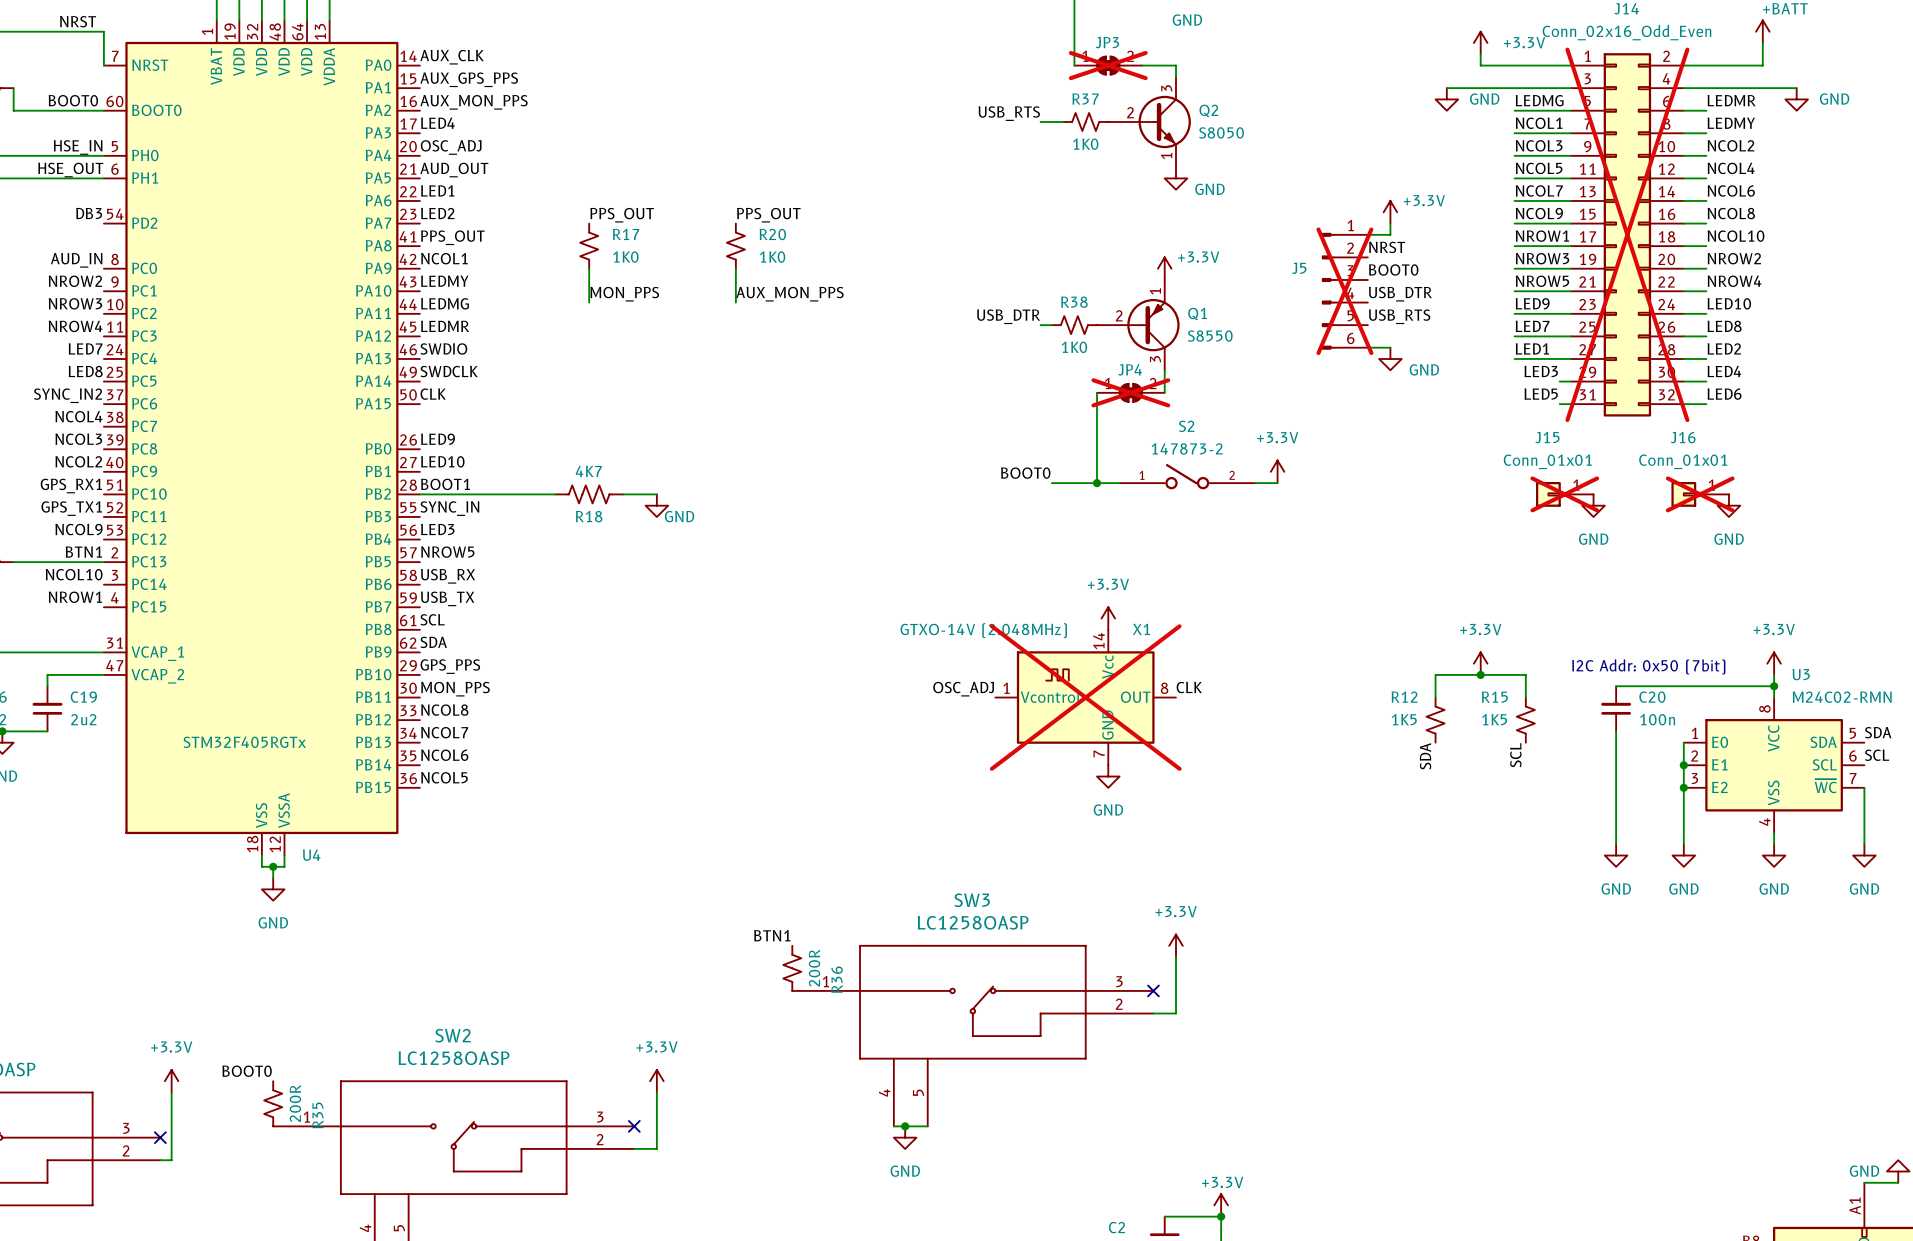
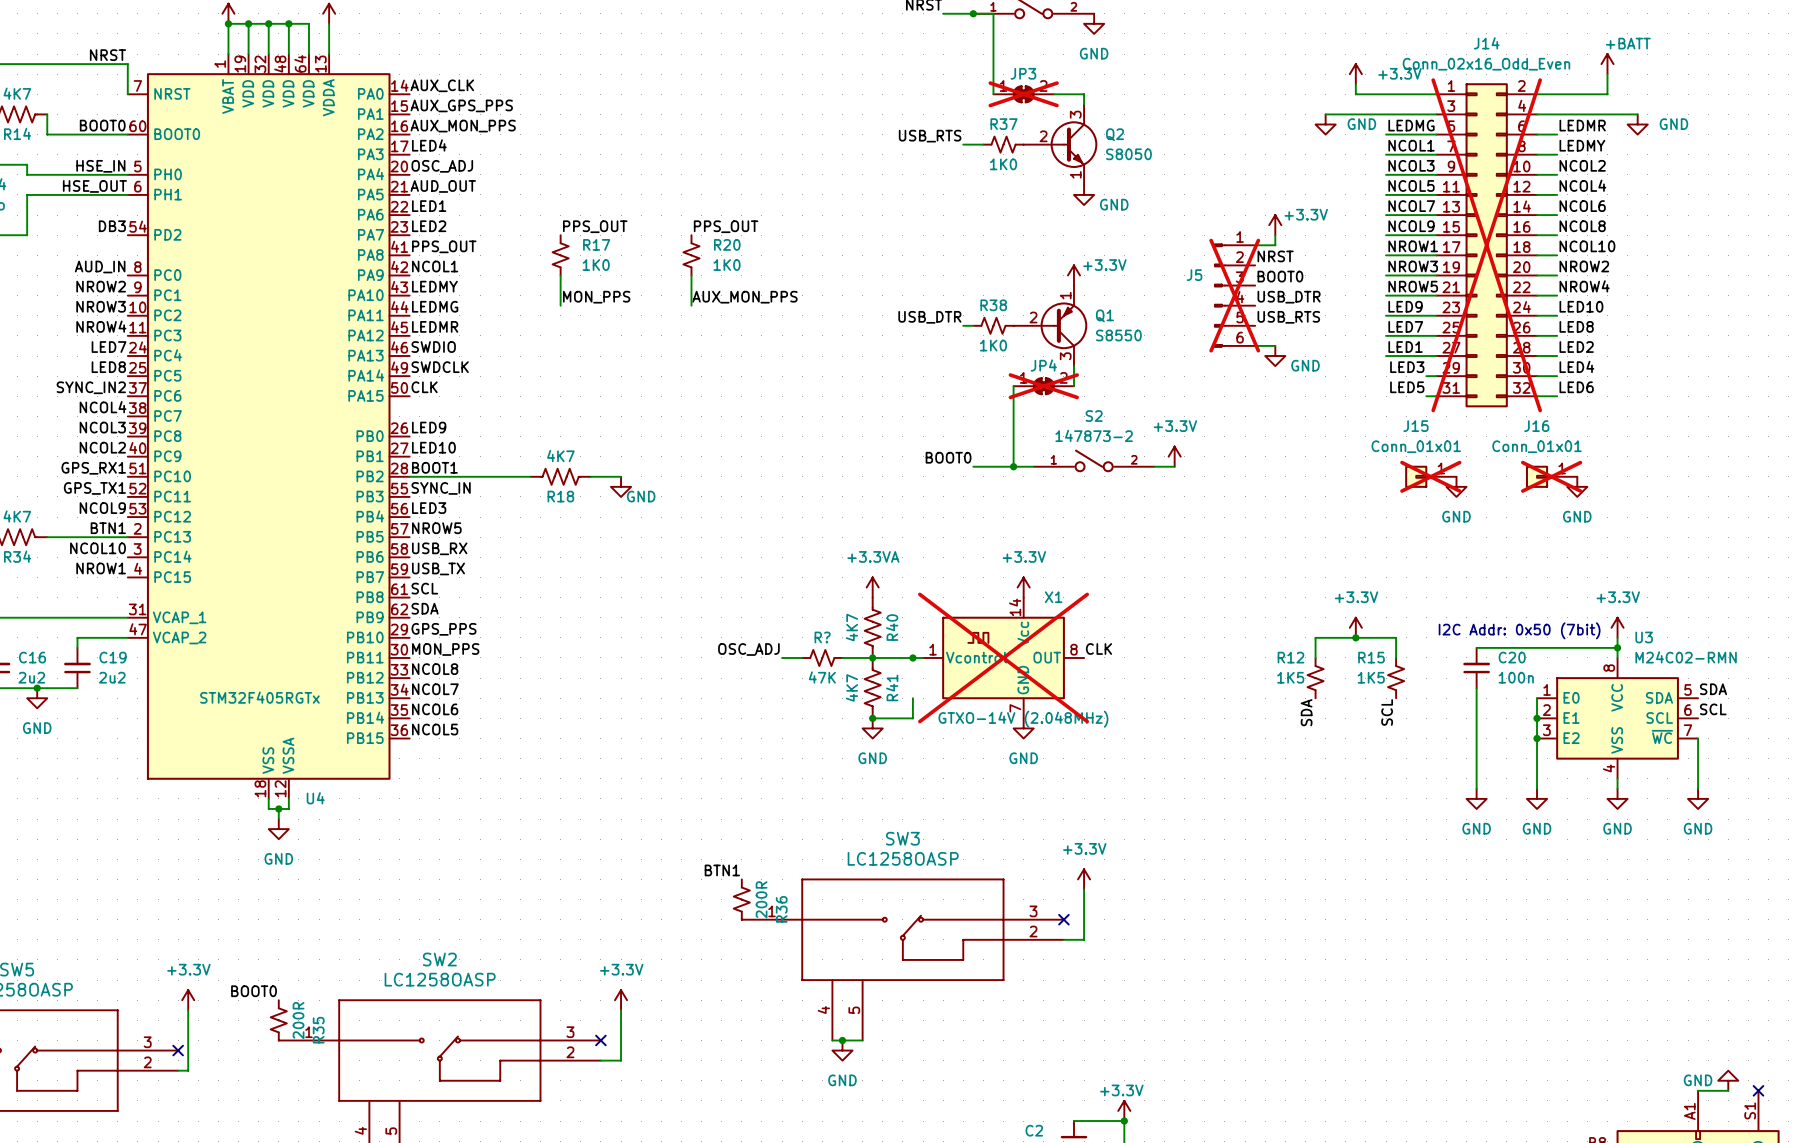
power symbol: none -> +3.3VA (872, 587)
X1 value position: GTXO-14V (2.048MHz) (983, 630) -> GTXO-14V (2.048MHz) (1023, 719)
R40: none -> 4K7 (872, 627)
label position: OSC_ADJ (963, 689) -> OSC_ADJ (748, 649)
wire: none -> (782, 657) (802, 657)
R?: none -> 47K (822, 657)
wire: none -> (842, 657) (923, 657)
junction: none -> (872, 657)
junction: none -> (912, 657)
R41: none -> 4K7 (872, 688)
wire: none -> (912, 698) (912, 718) (872, 718)
junction: none -> (872, 718)
power symbol: none -> GND (872, 728)

